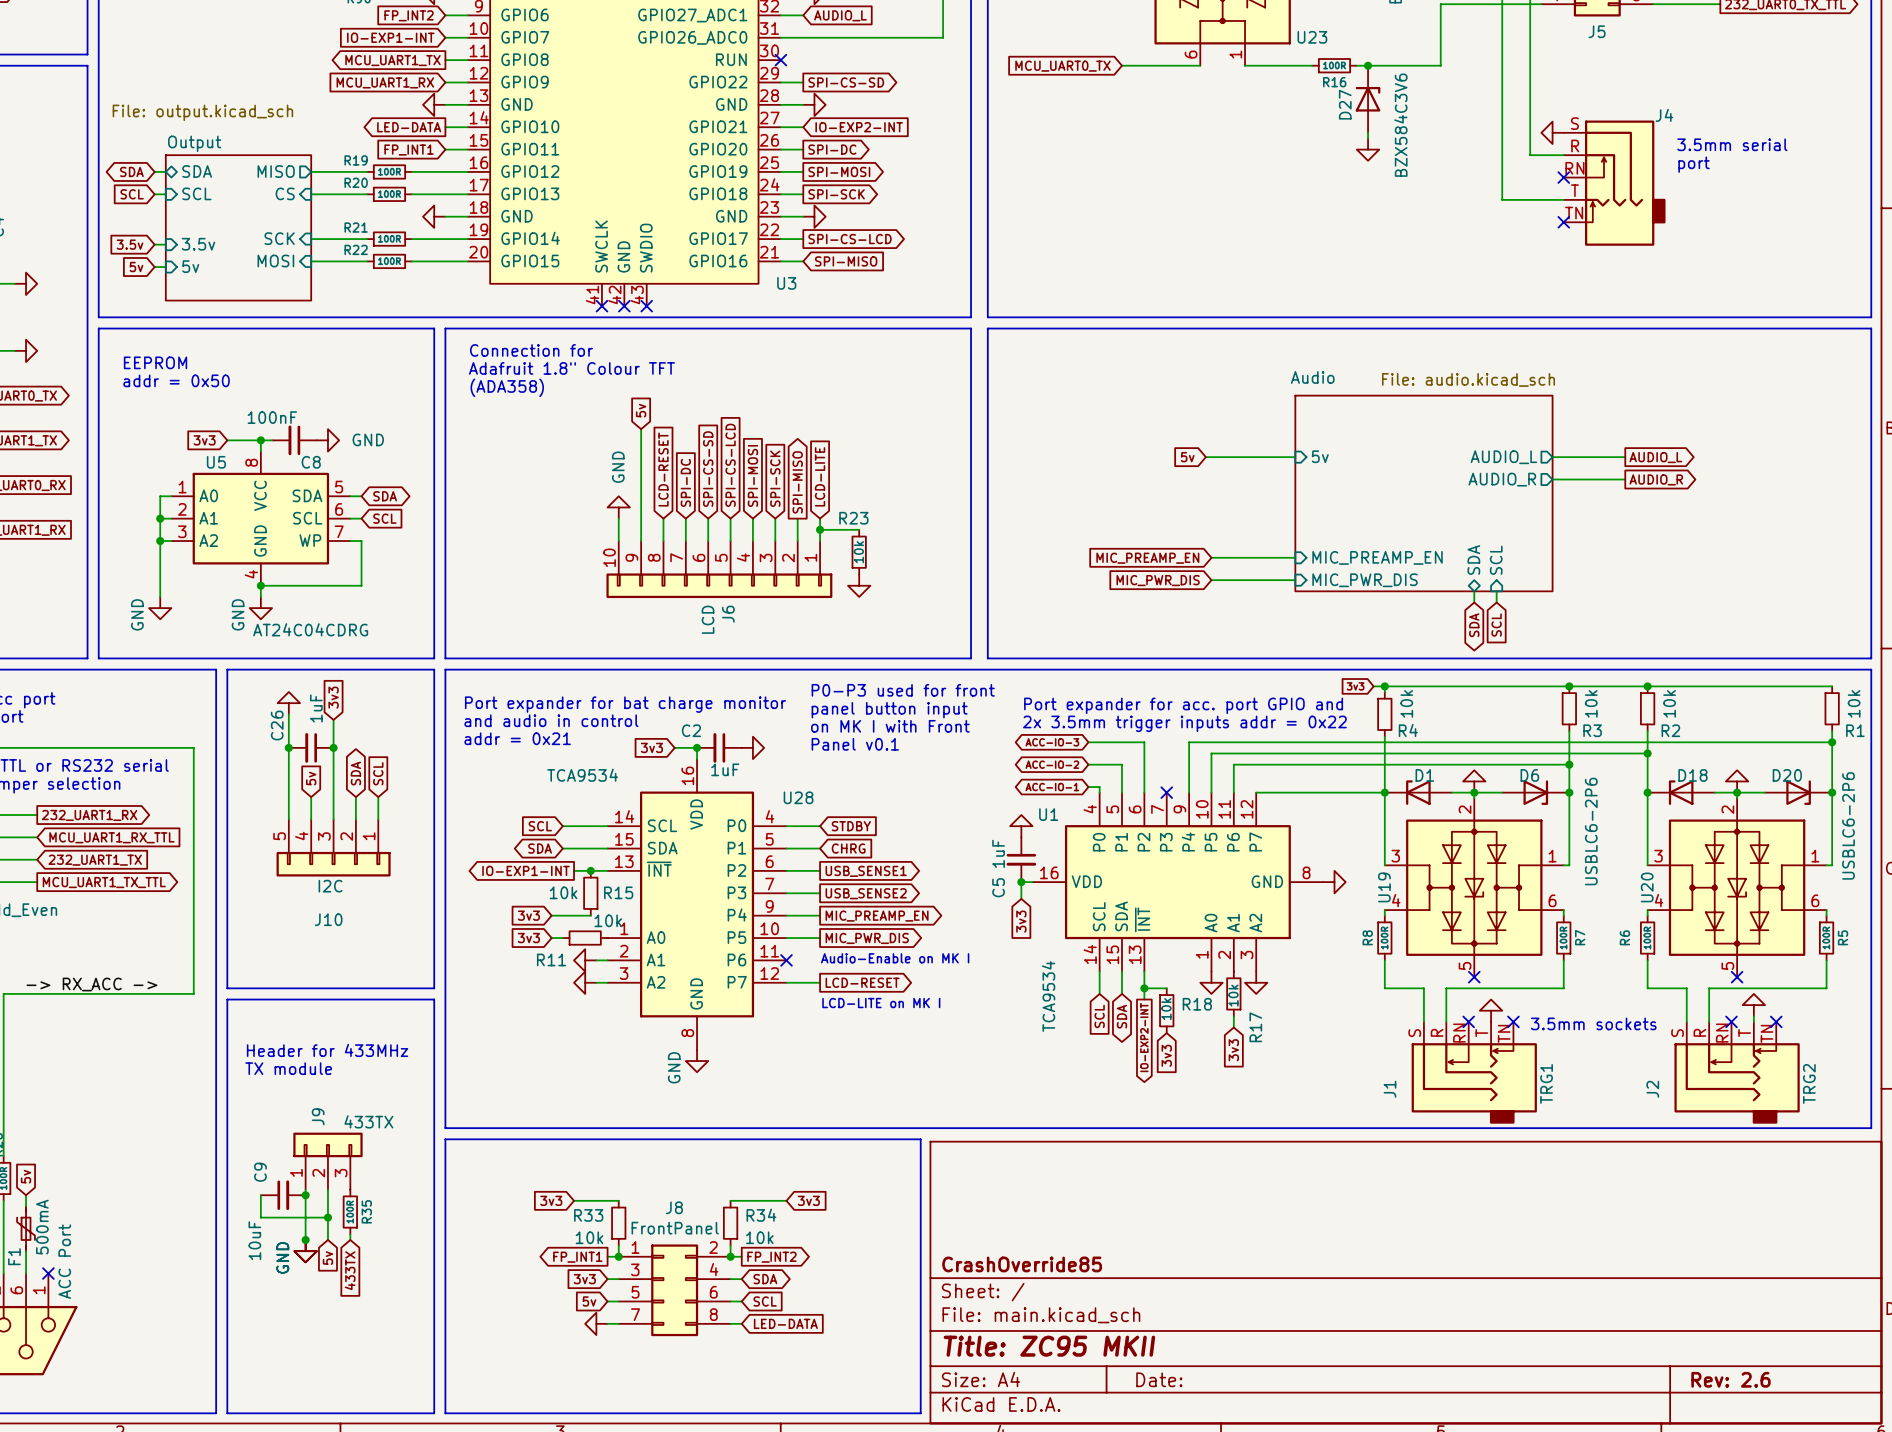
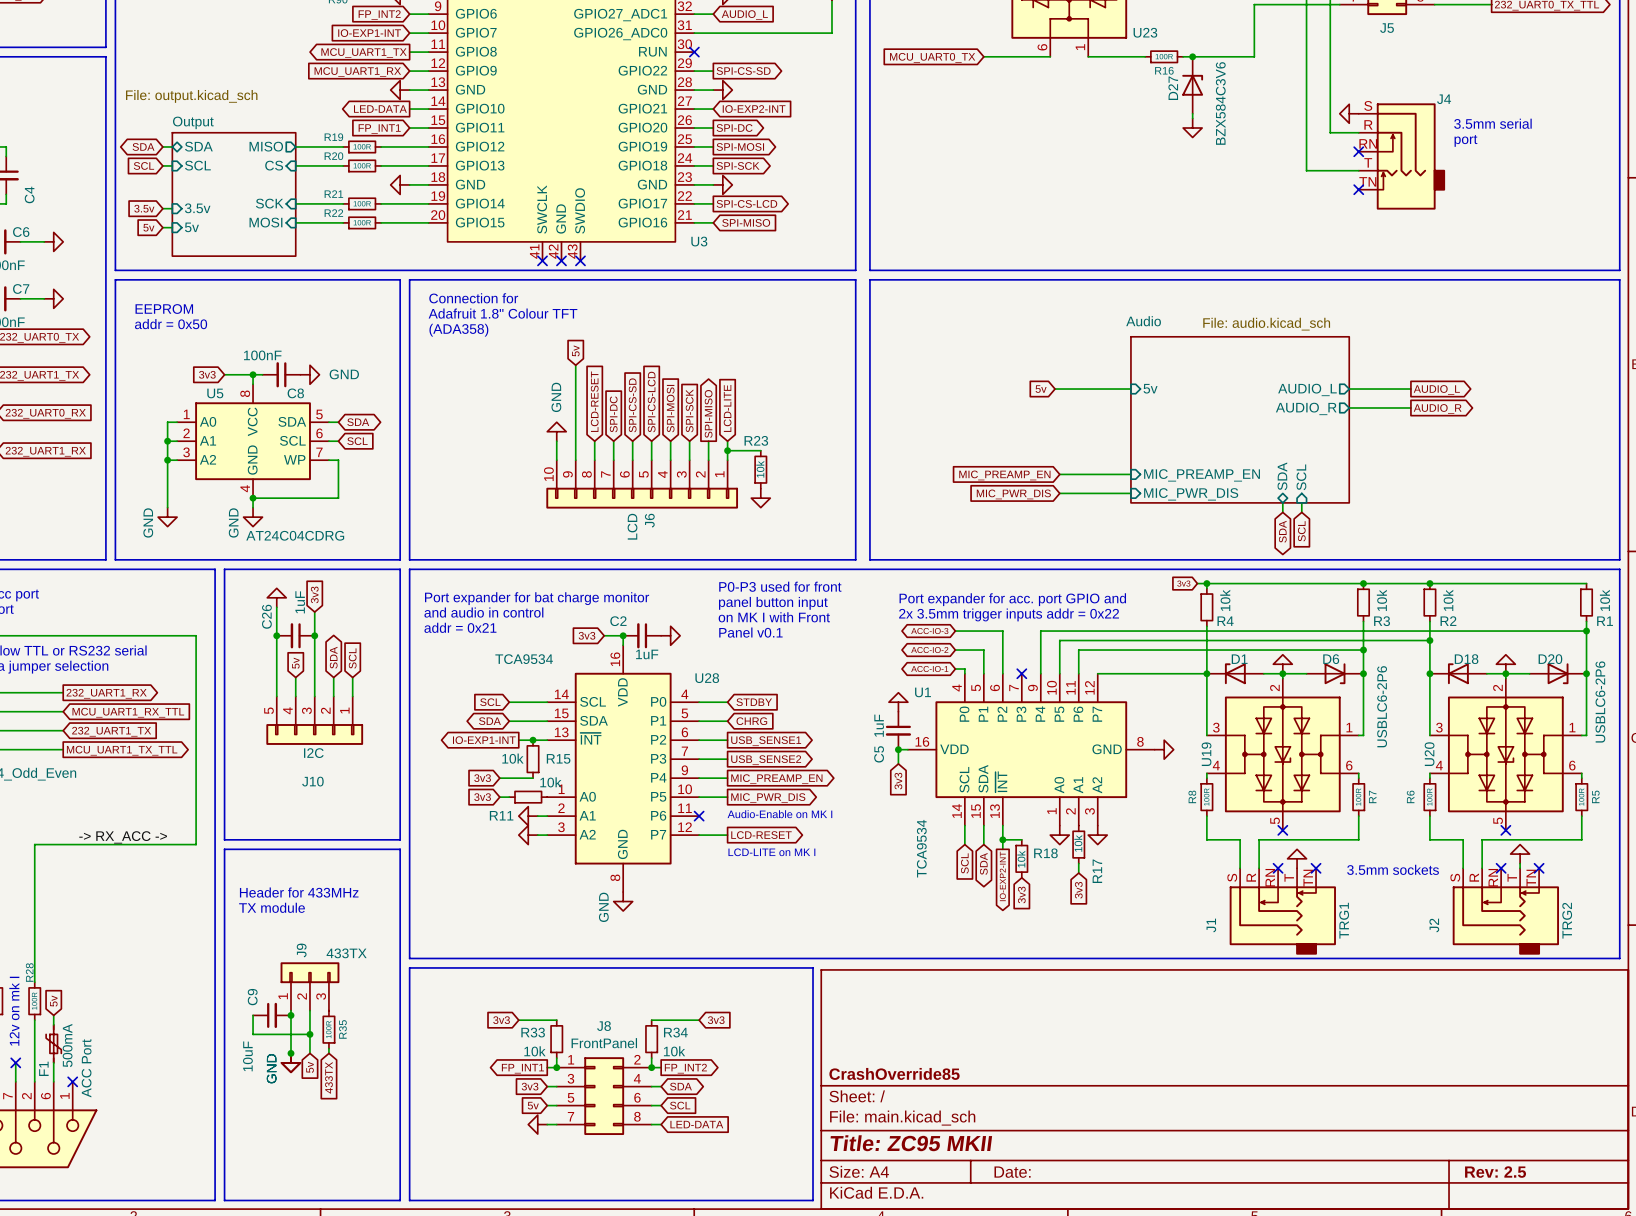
title block: Rev: 2.6 (1730, 1379) -> Rev: 2.5 (1495, 1172)

